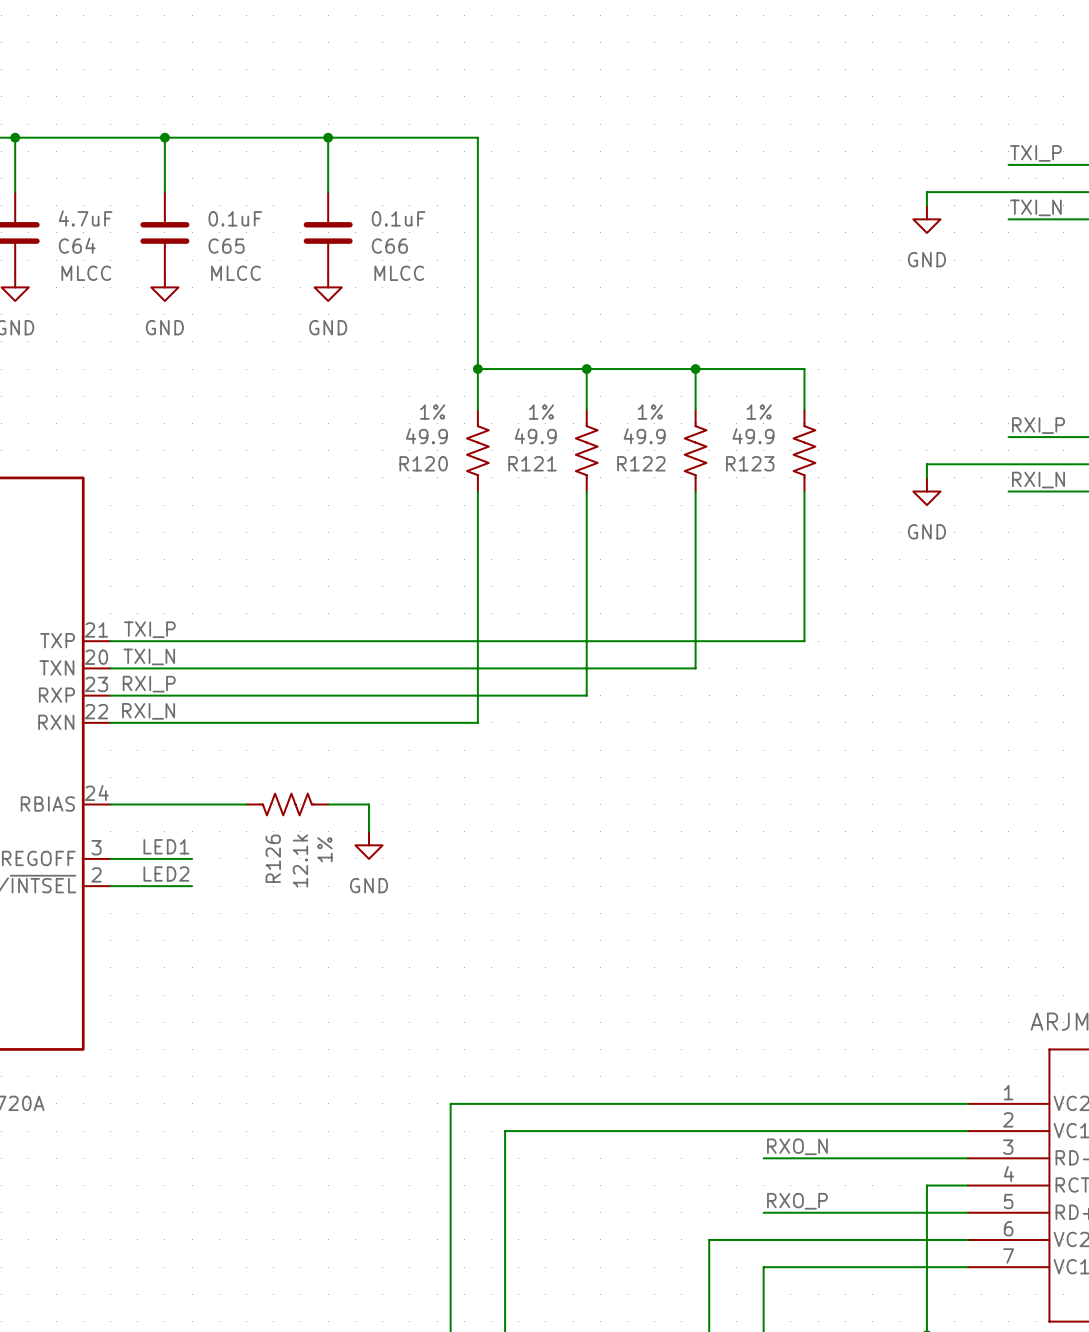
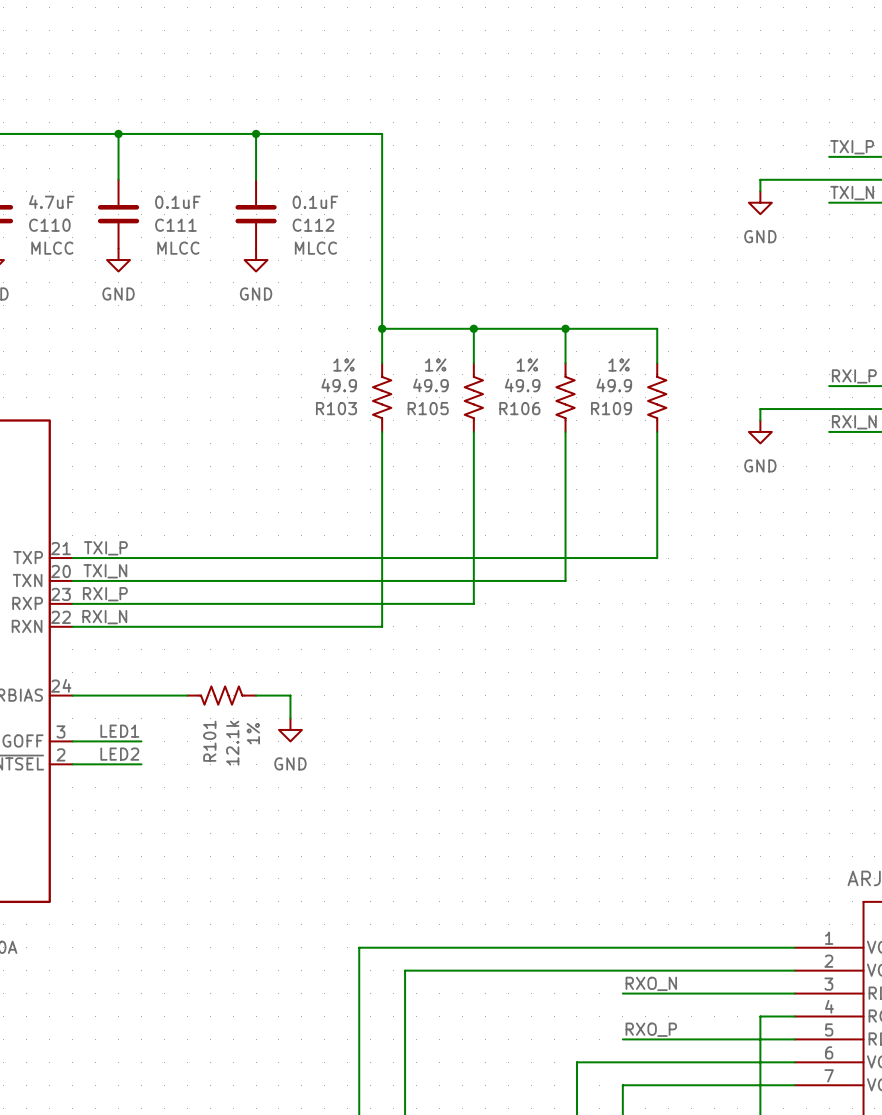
C64 name: C64 (77, 245) -> C110 (49, 225)
C65 name: C65 (226, 246) -> C111 (175, 225)
C66 name: C66 (389, 246) -> C112 (313, 225)
R120 name: R120 (423, 463) -> R103 (336, 408)
R121 name: R121 (532, 463) -> R105 (428, 408)
R122 name: R122 (641, 463) -> R106 (519, 408)
R123 name: R123 (750, 463) -> R109 (611, 408)
R126 name: R126 (273, 858) -> R101 (209, 741)

